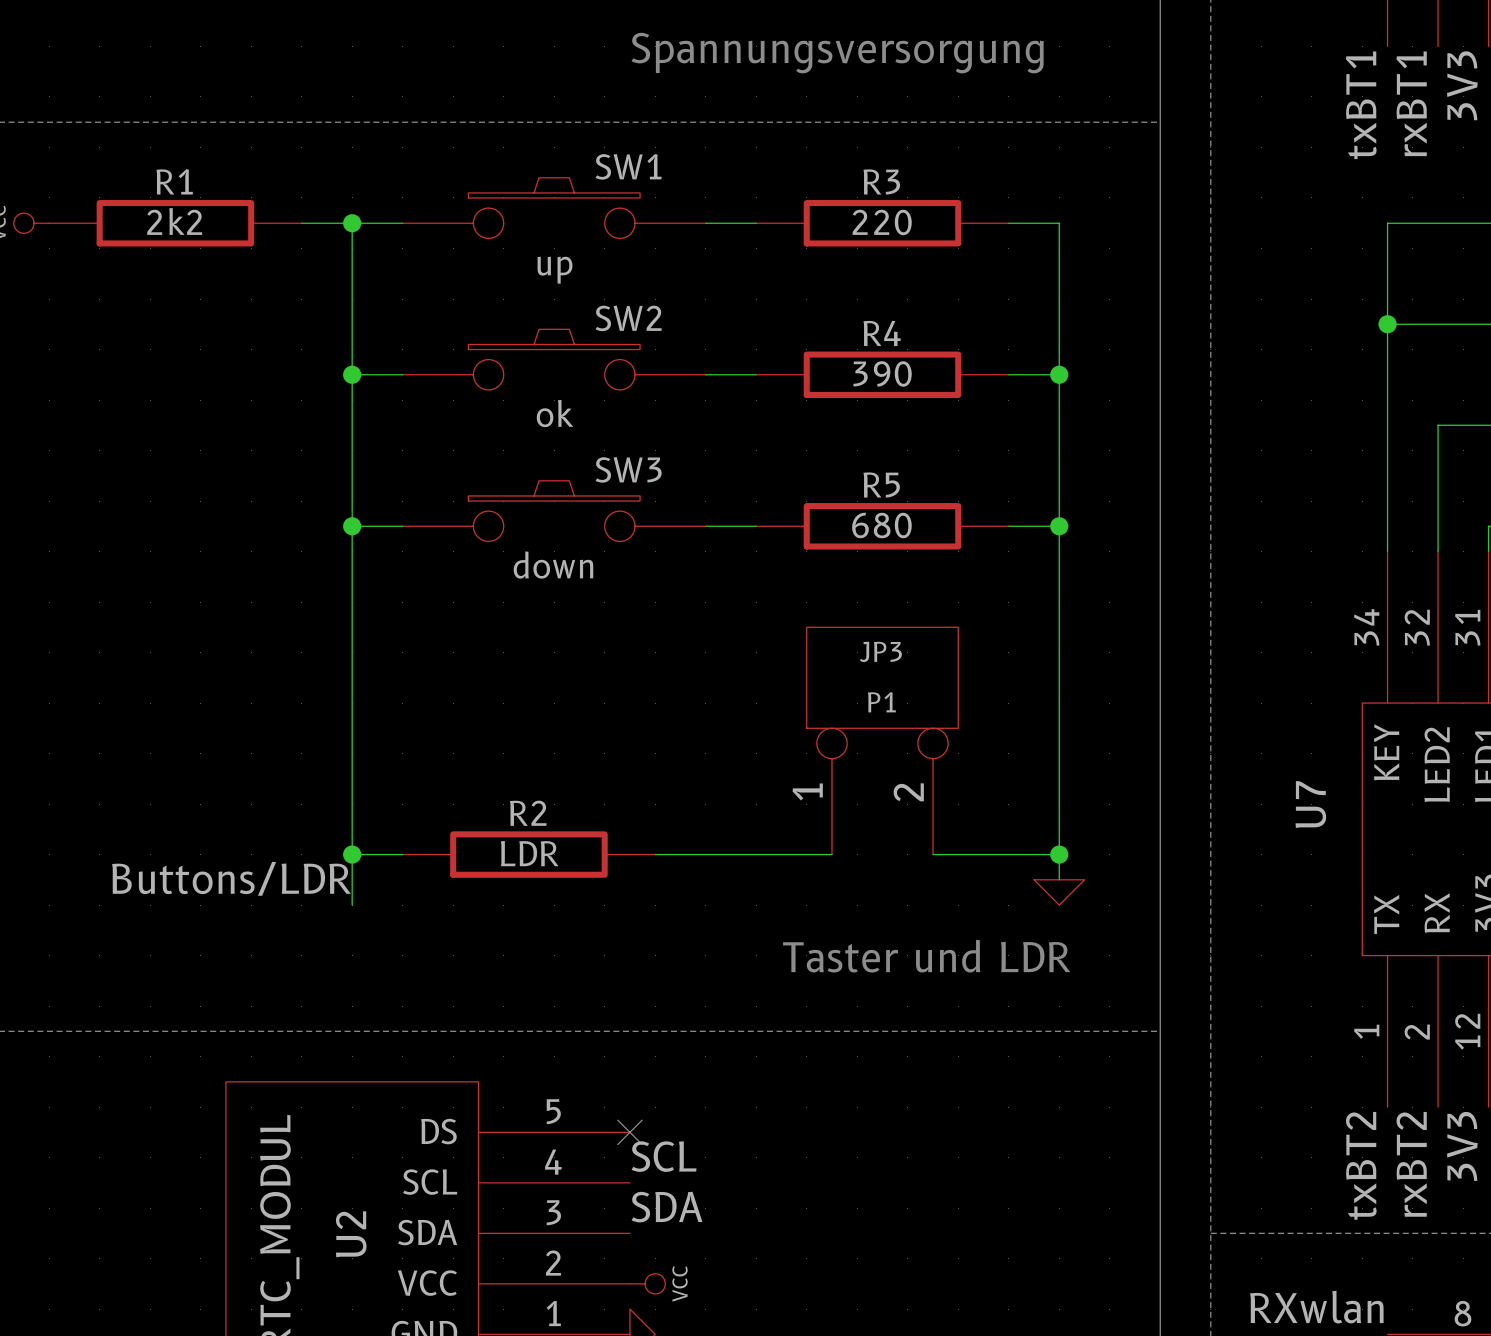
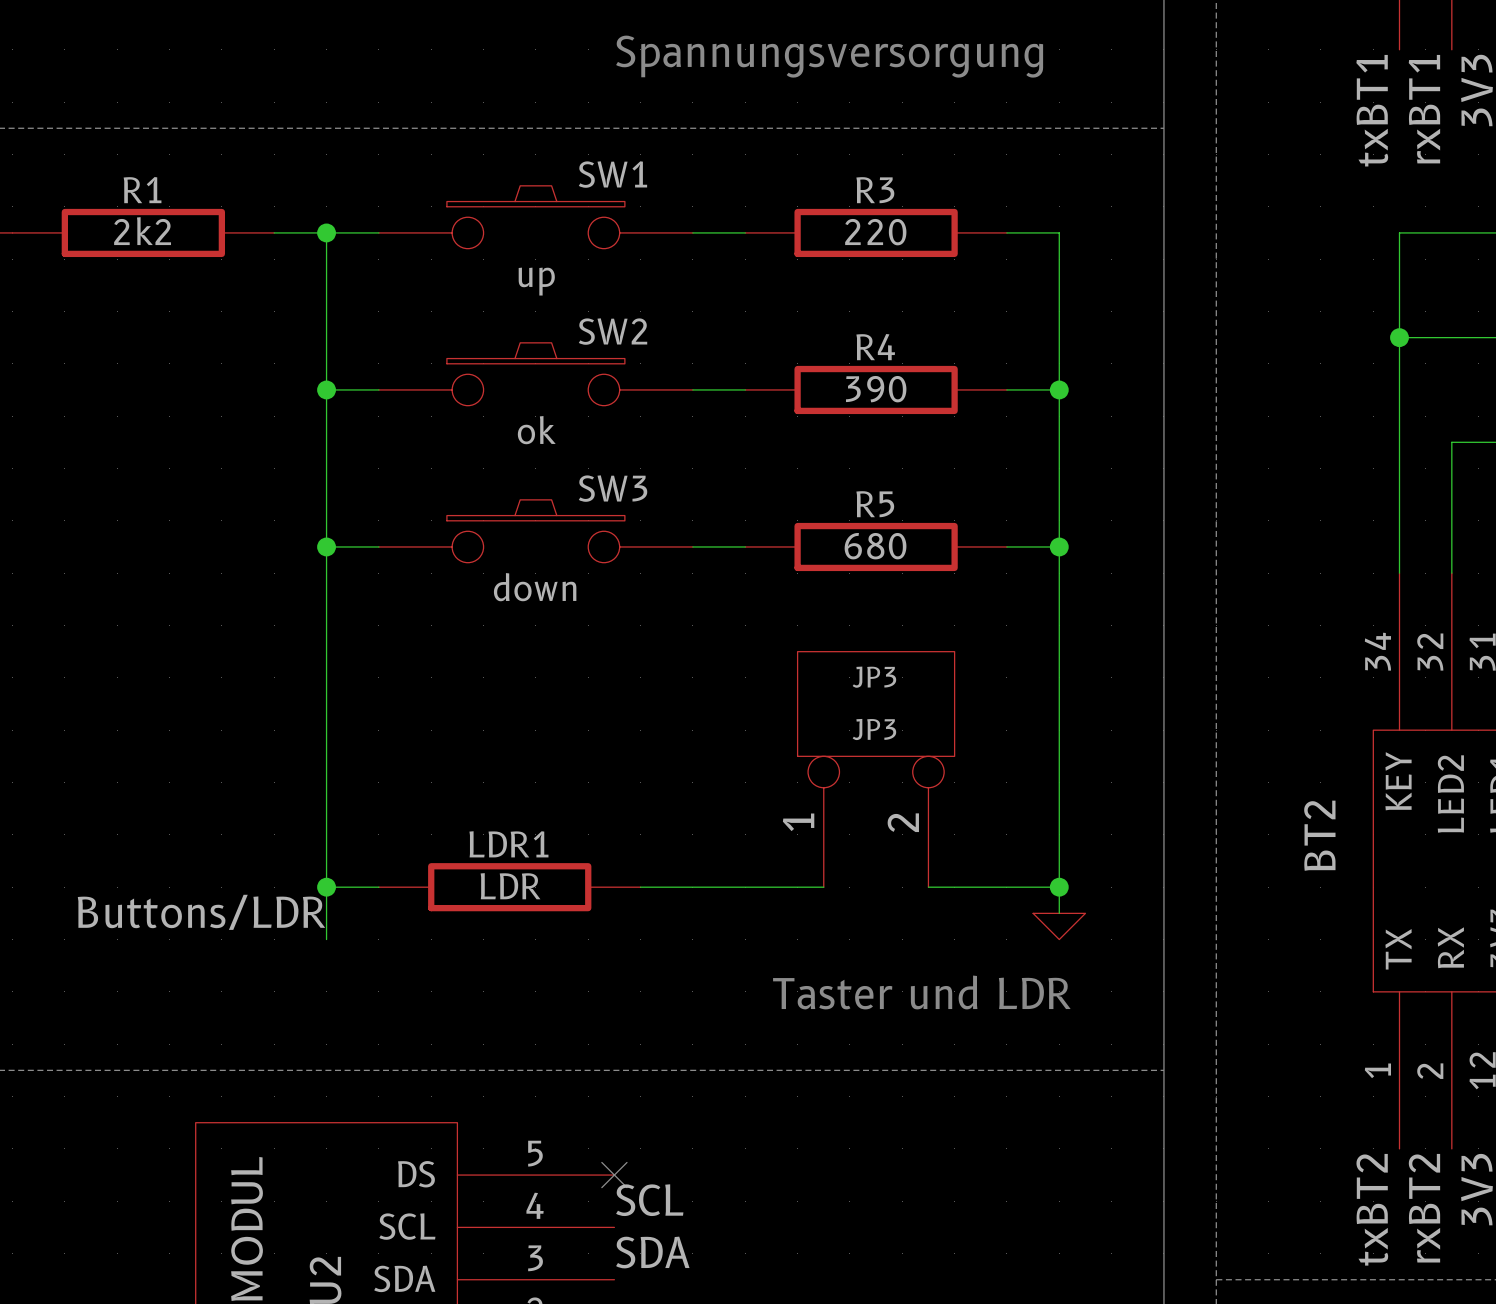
P1 name: P1 (881, 702) -> JP3 (874, 729)
U7 name: U7 (1310, 804) -> BT2 (1319, 835)
R2 name: R2 (528, 813) -> LDR1 (508, 844)

